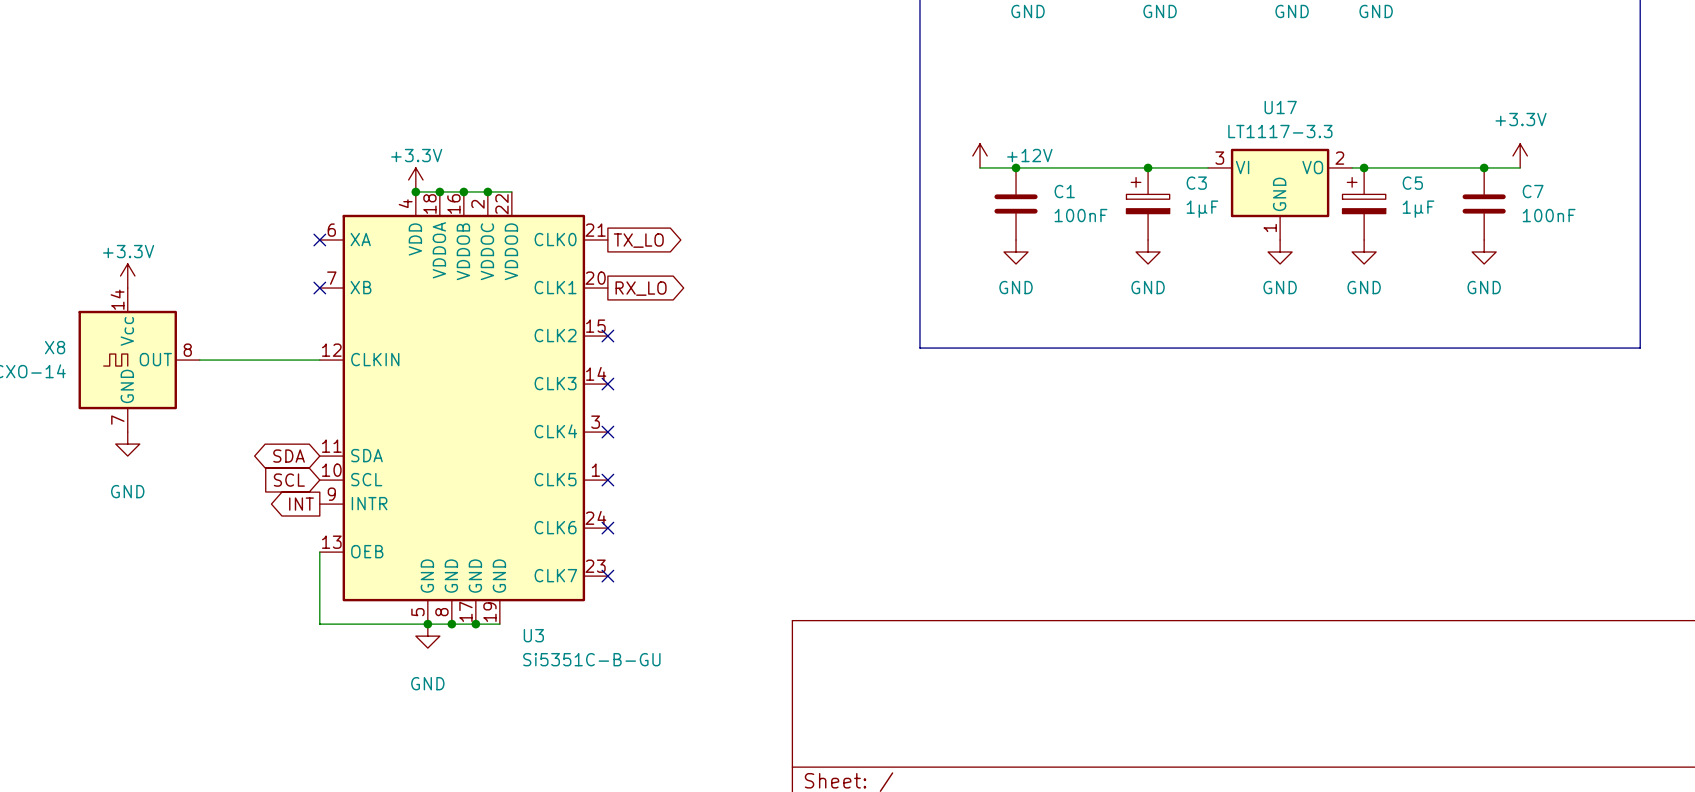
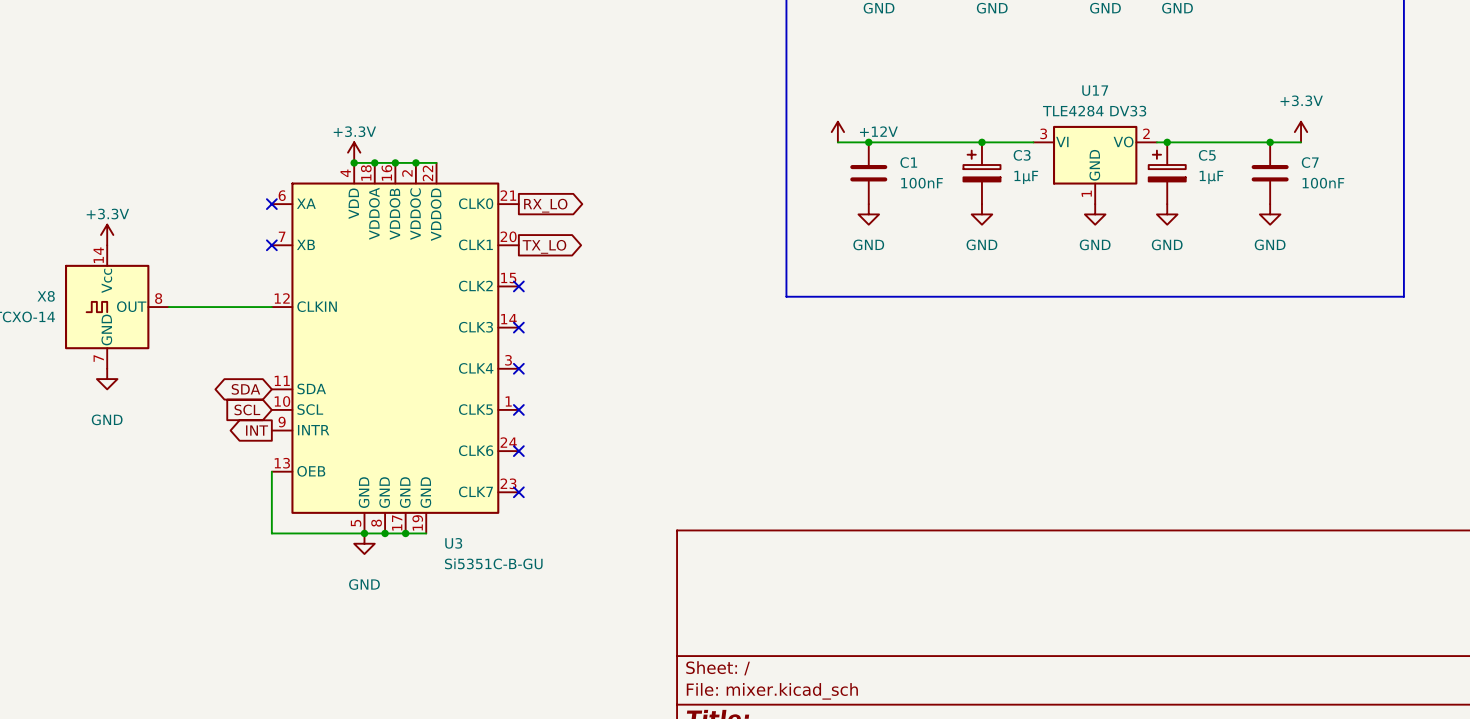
U17 value: LT1117-3.3 (1280, 131) -> TLE4284 DV33 (1094, 111)
global label: TX_LO (638, 240) -> RX_LO (545, 205)
global label: RX_LO (641, 288) -> TX_LO (544, 246)

